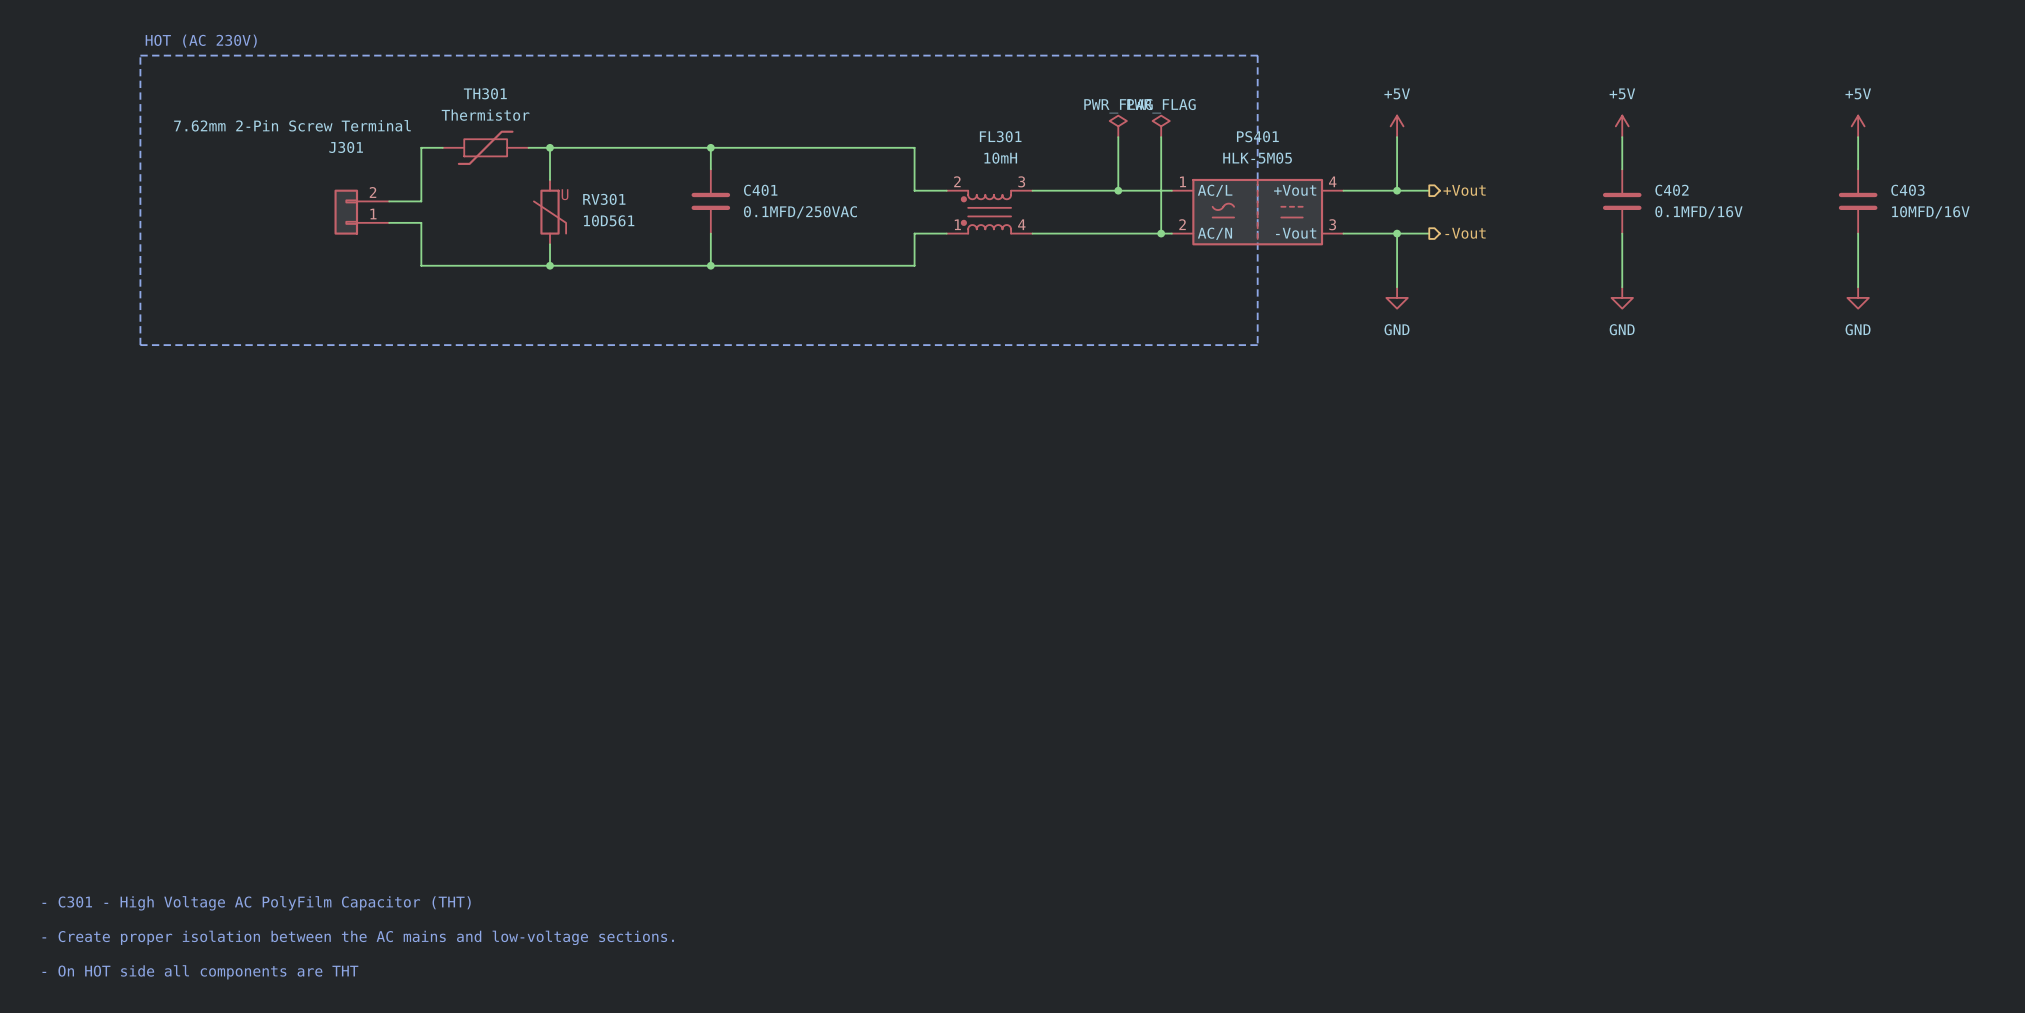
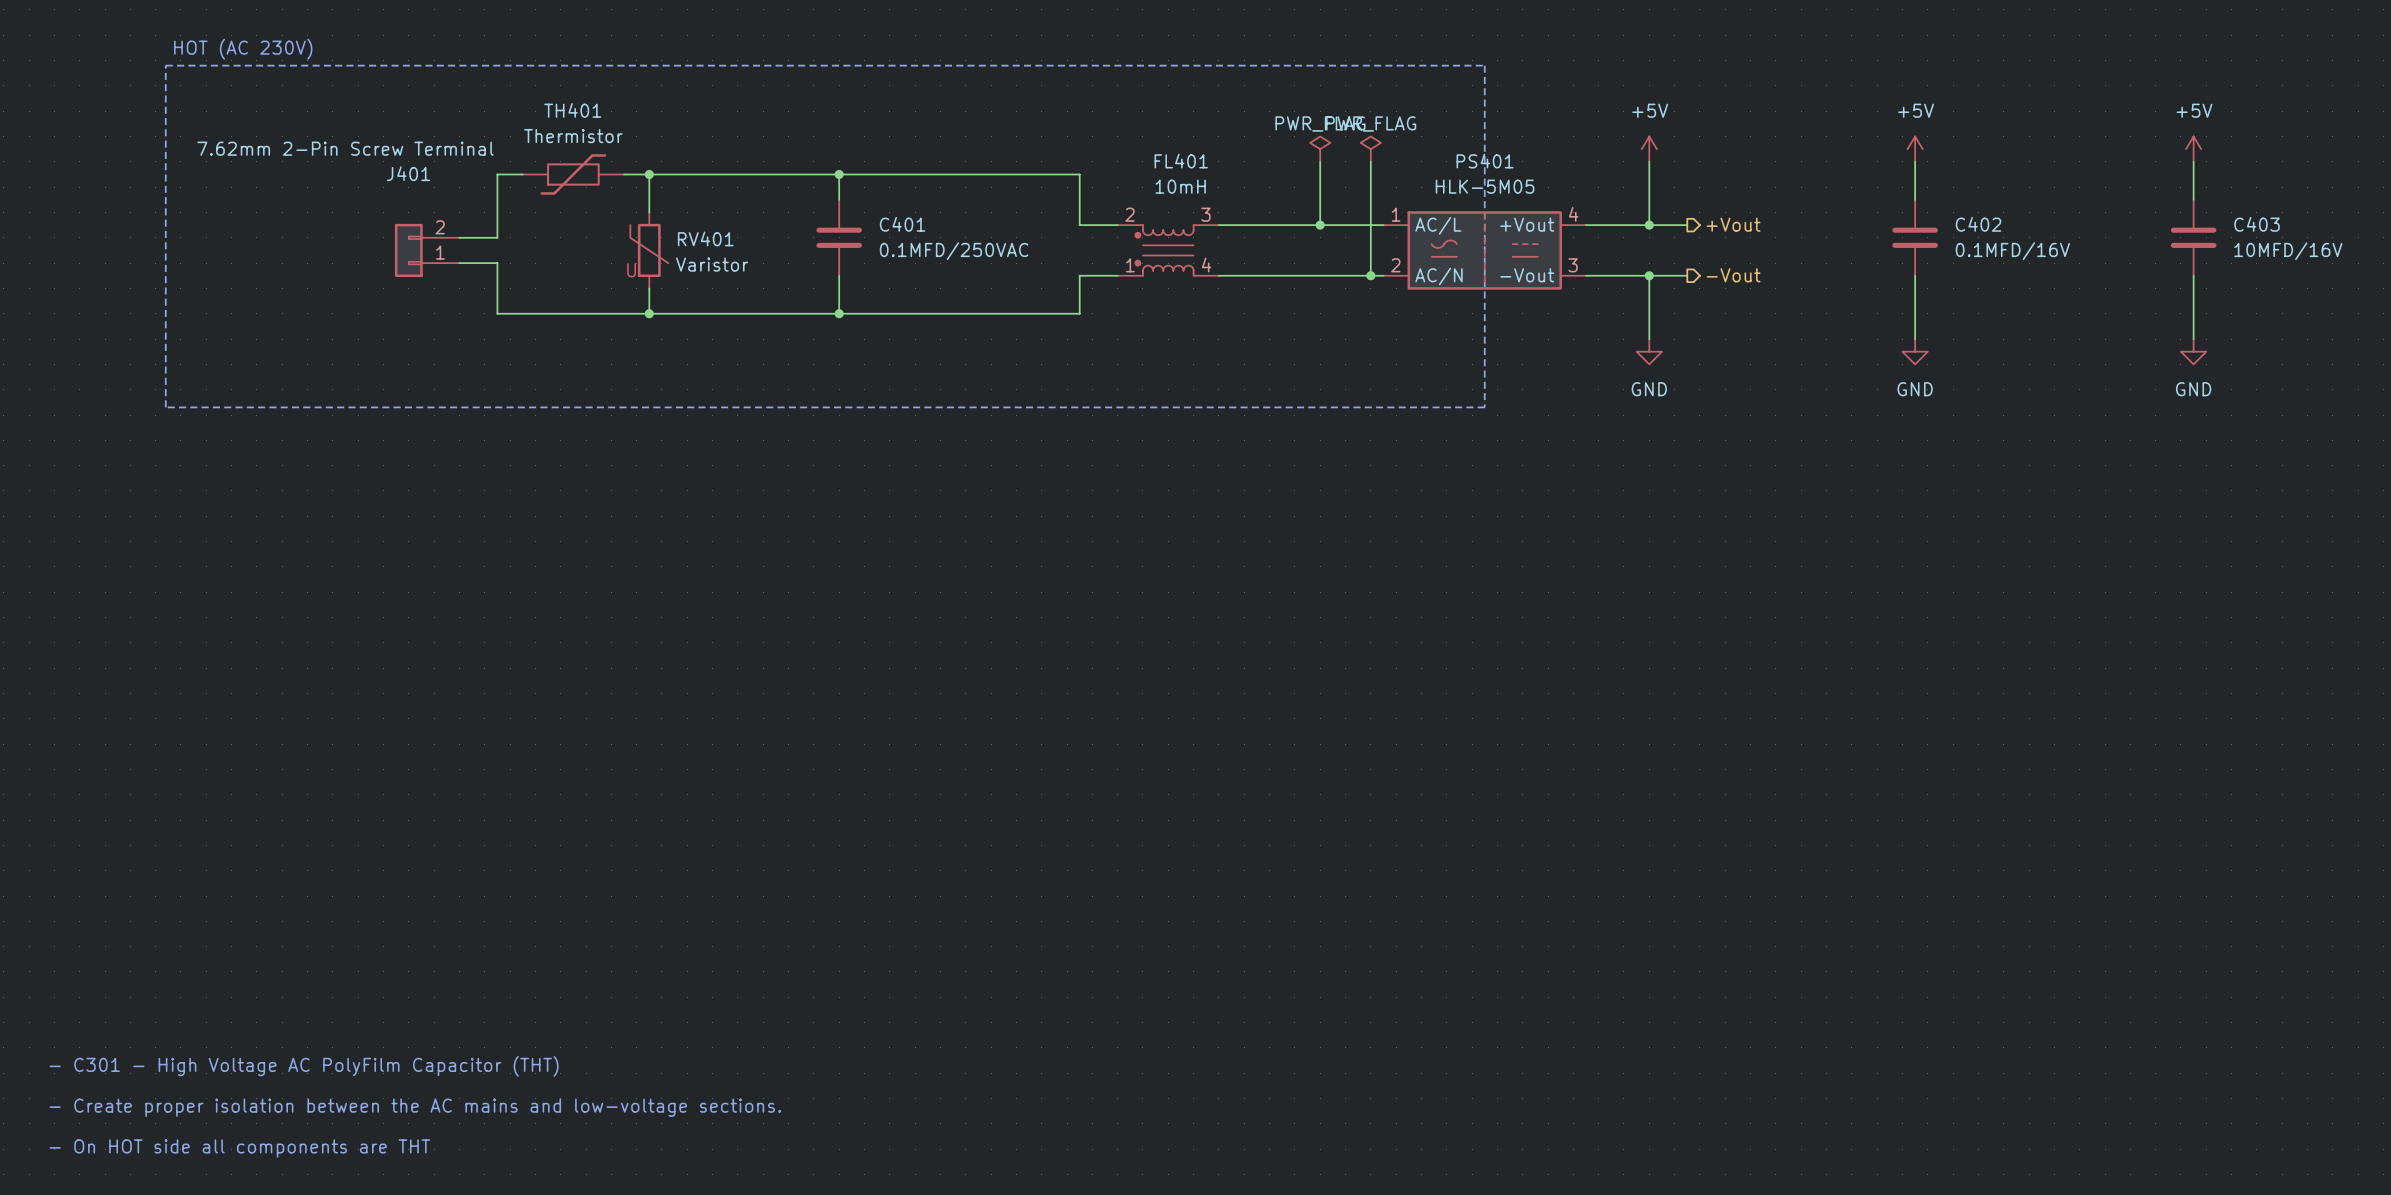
TH301 name: TH301 (485, 93) -> TH401 (572, 110)
FL301 name: FL301 (1000, 136) -> FL401 (1181, 161)
J301 name: J301 (346, 147) -> J401 (408, 173)
RV301: 10D561 (550, 212) -> none
RV401: none -> Varistor (649, 250)

